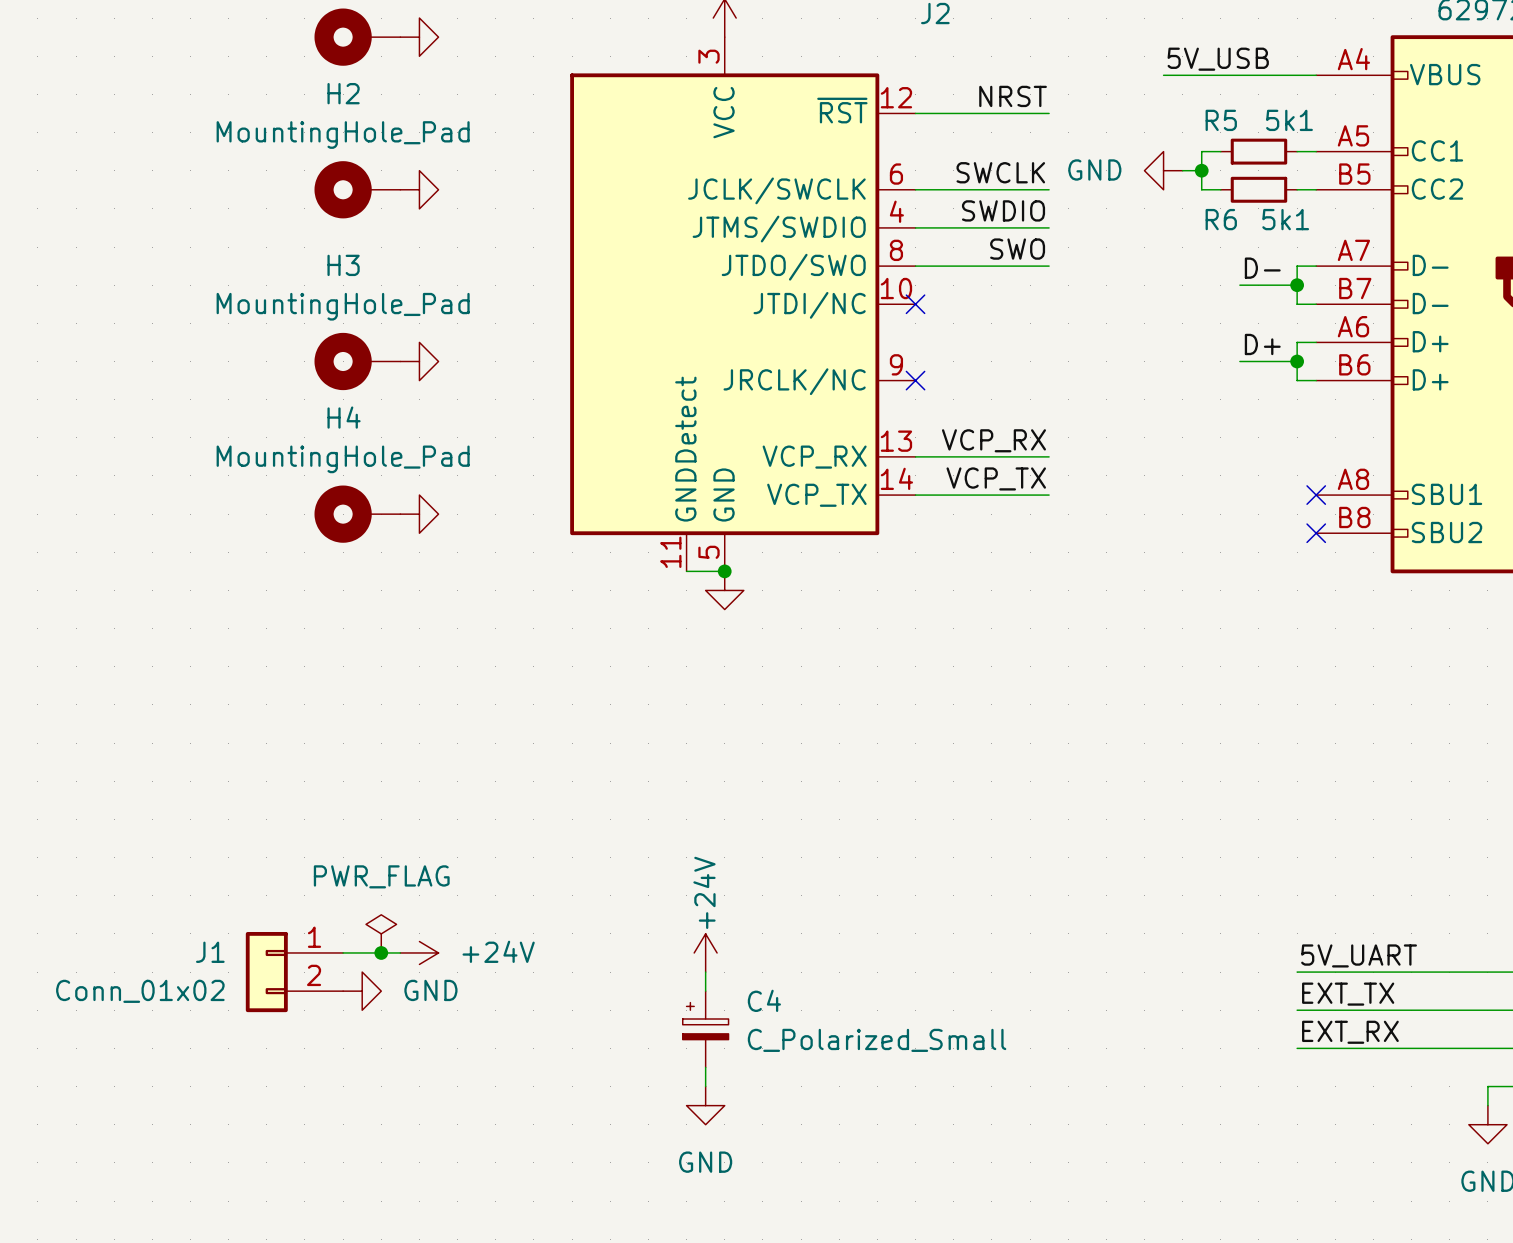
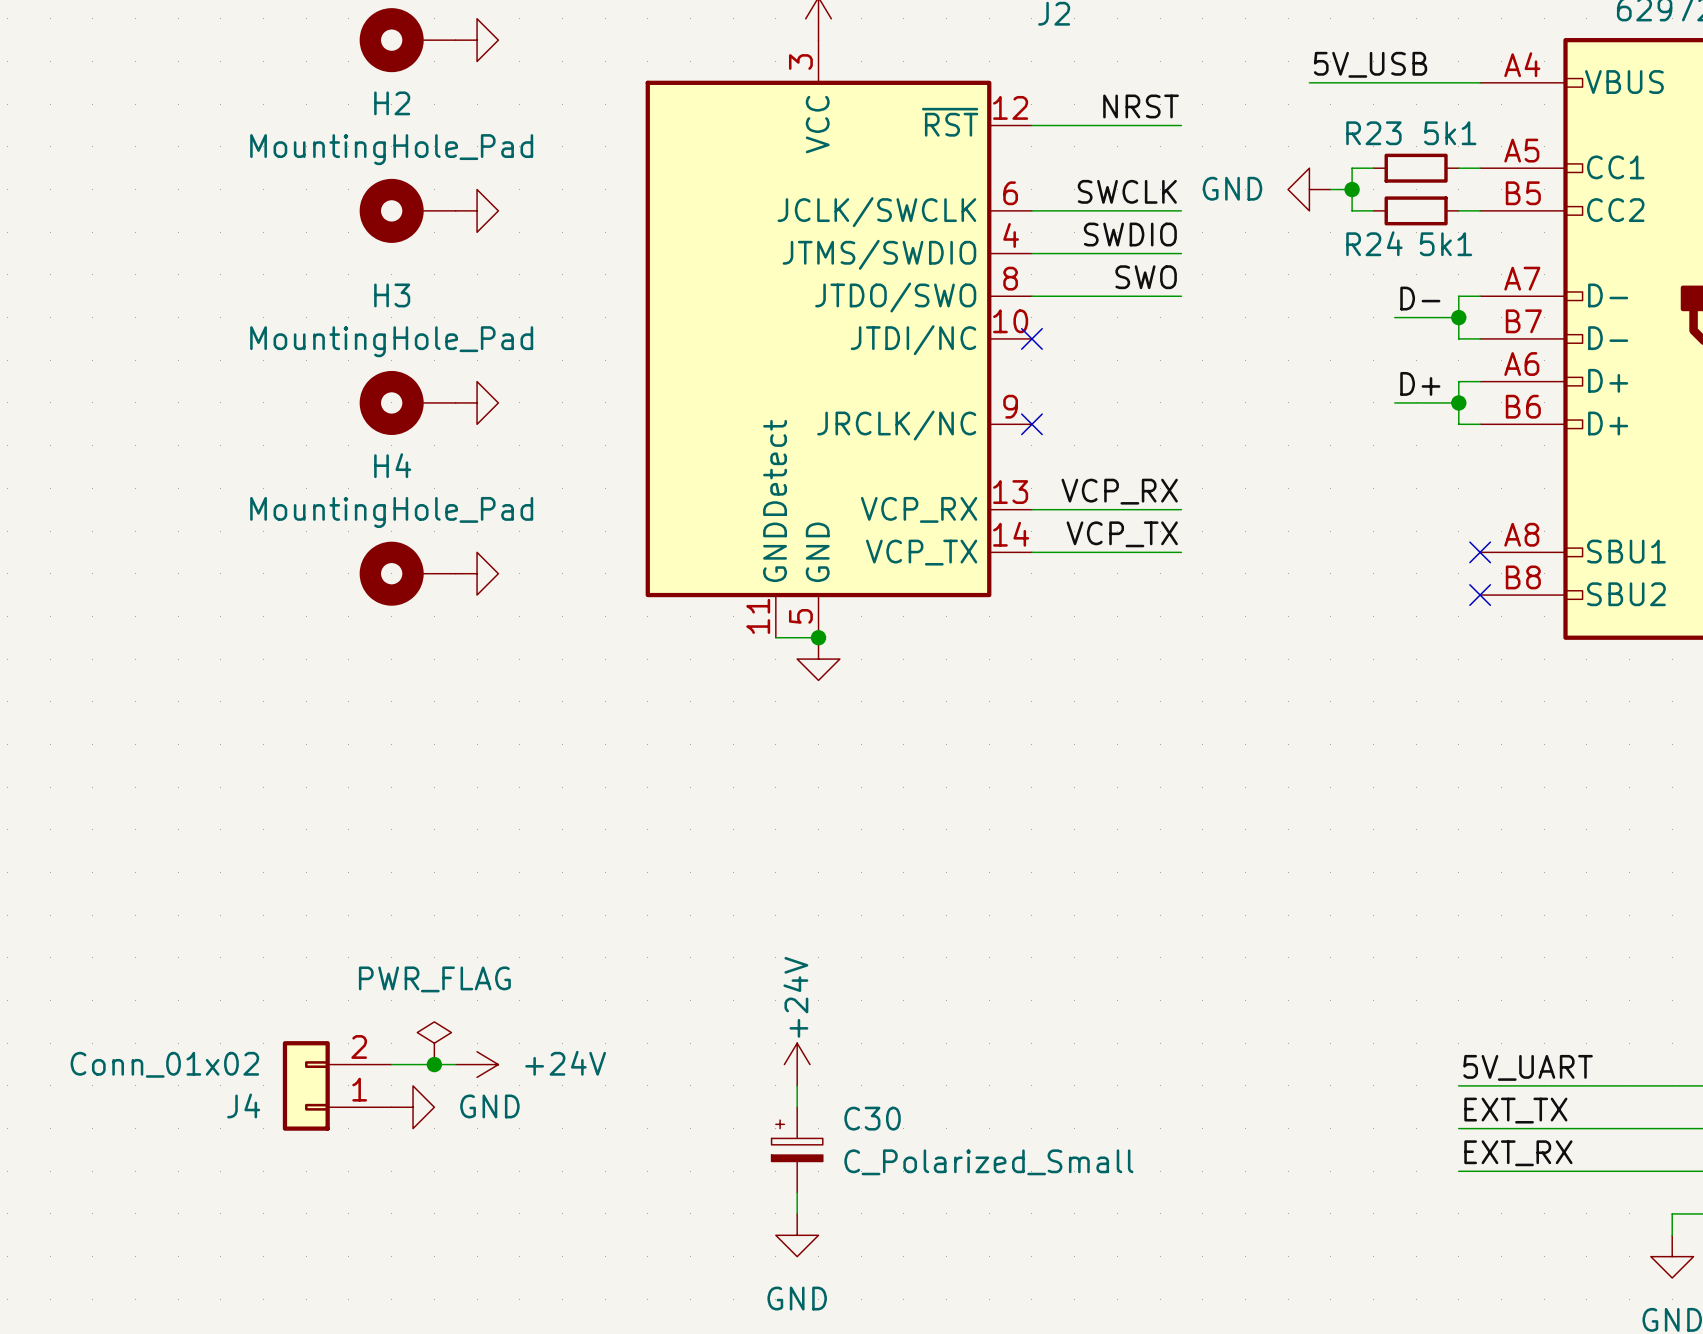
R5 name: R5 (1221, 120) -> R23 (1373, 133)
R6 name: R6 (1221, 219) -> R24 (1374, 243)
J1 name: J1 (210, 952) -> J4 (243, 1105)
J1 flip: as is (266, 972) -> up-down (306, 1085)
C4 name: C4 (764, 1000) -> C30 (872, 1118)

